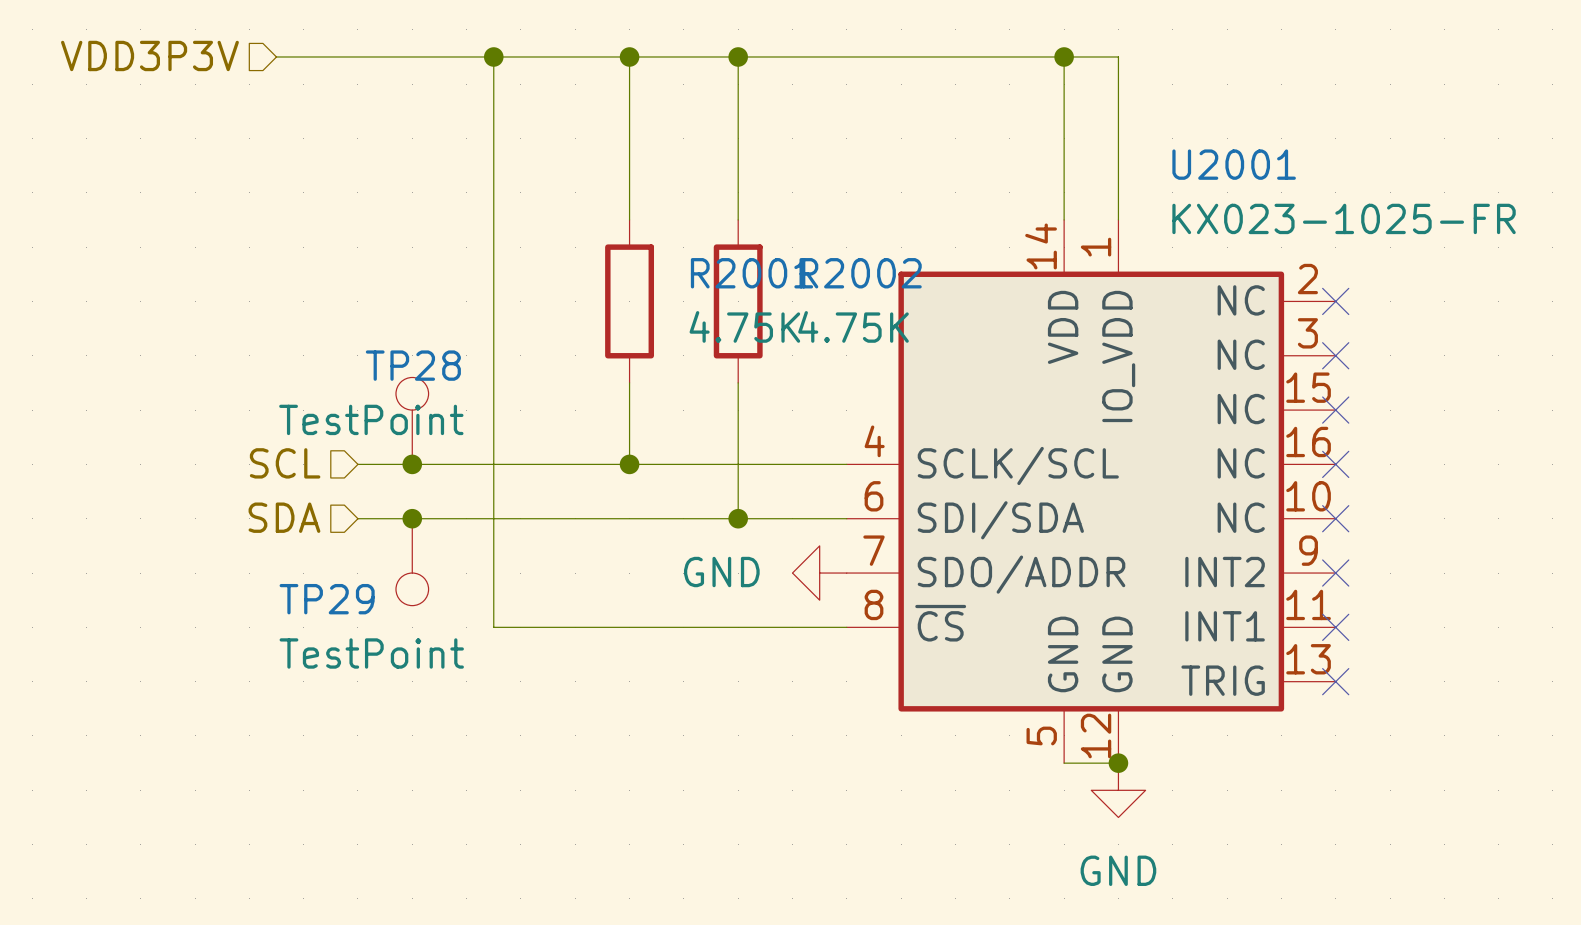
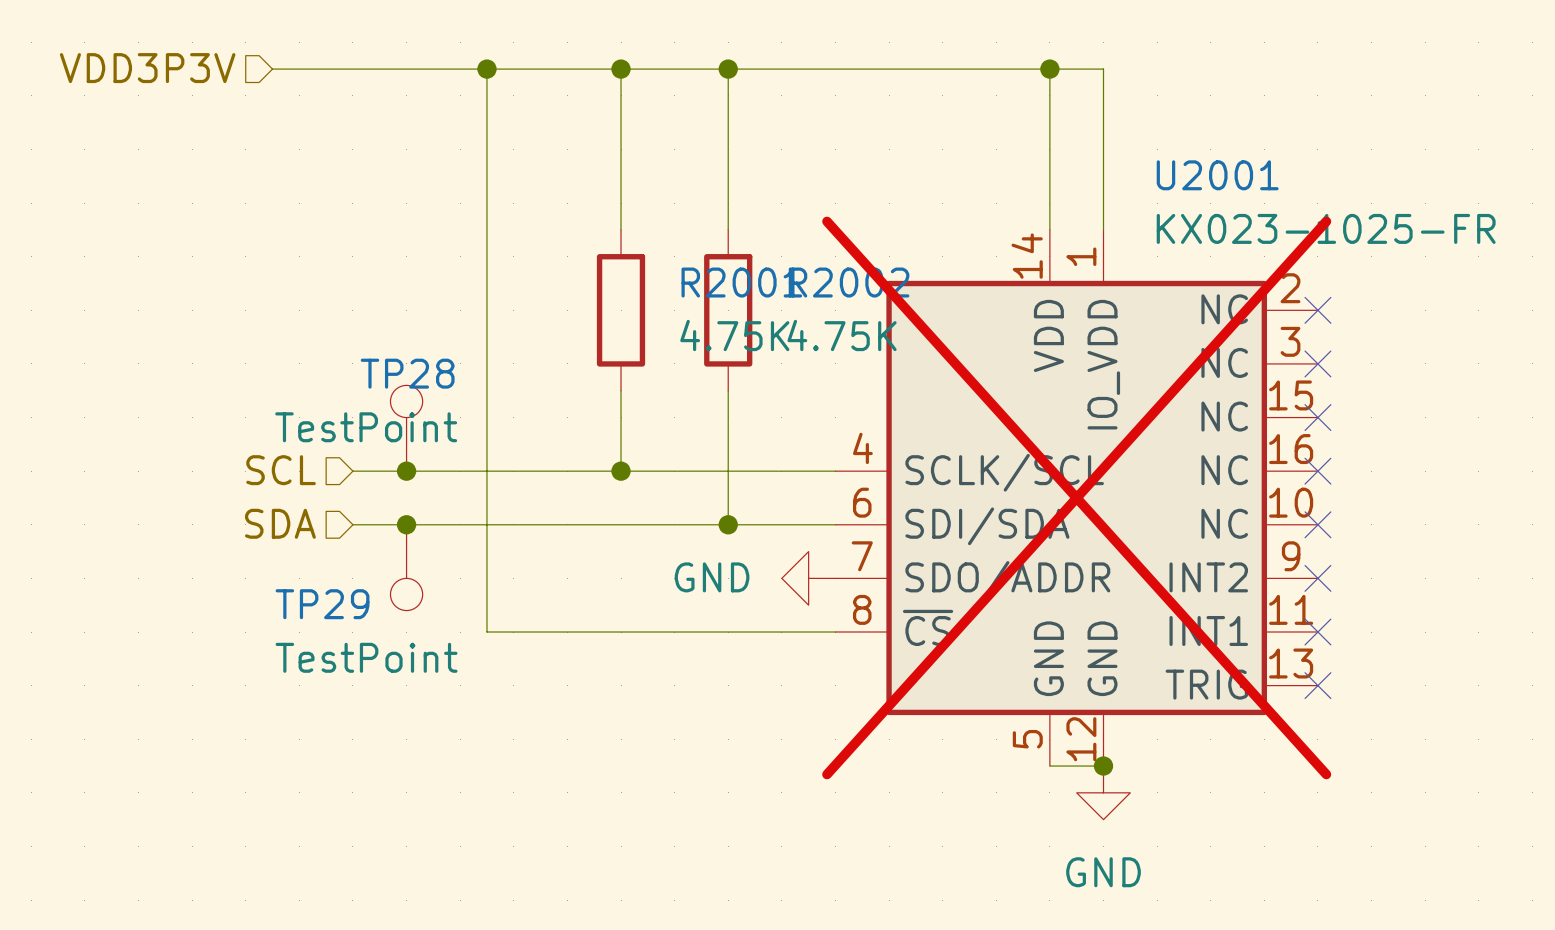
U2001 do-not-place cross: none -> (1076, 497)

